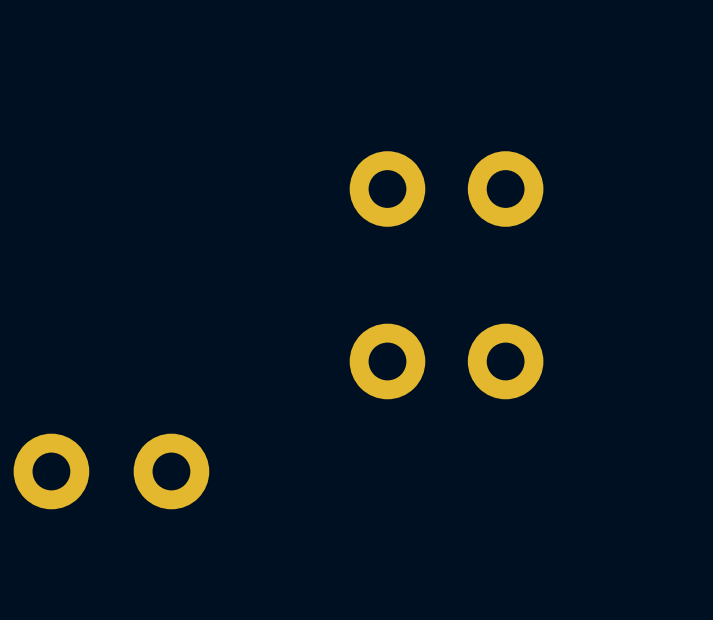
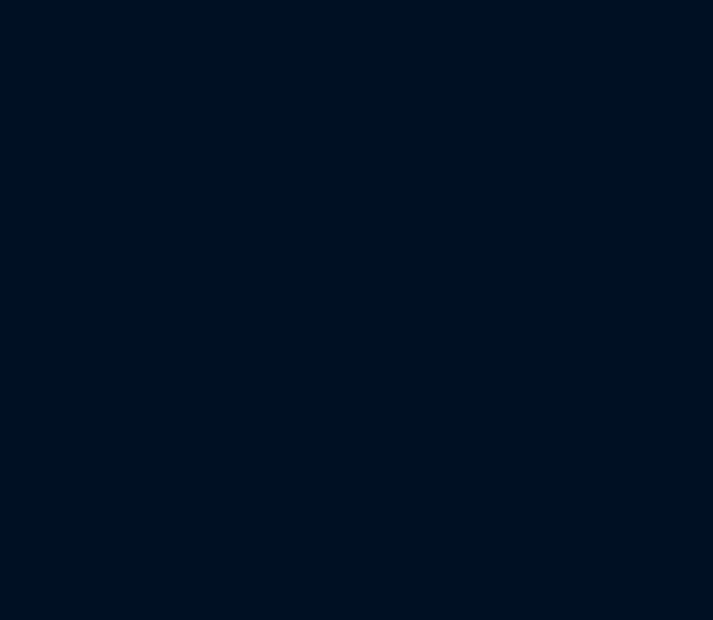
part: (446, 189) -> none
part: (446, 361) -> none
part: (111, 471) -> none

